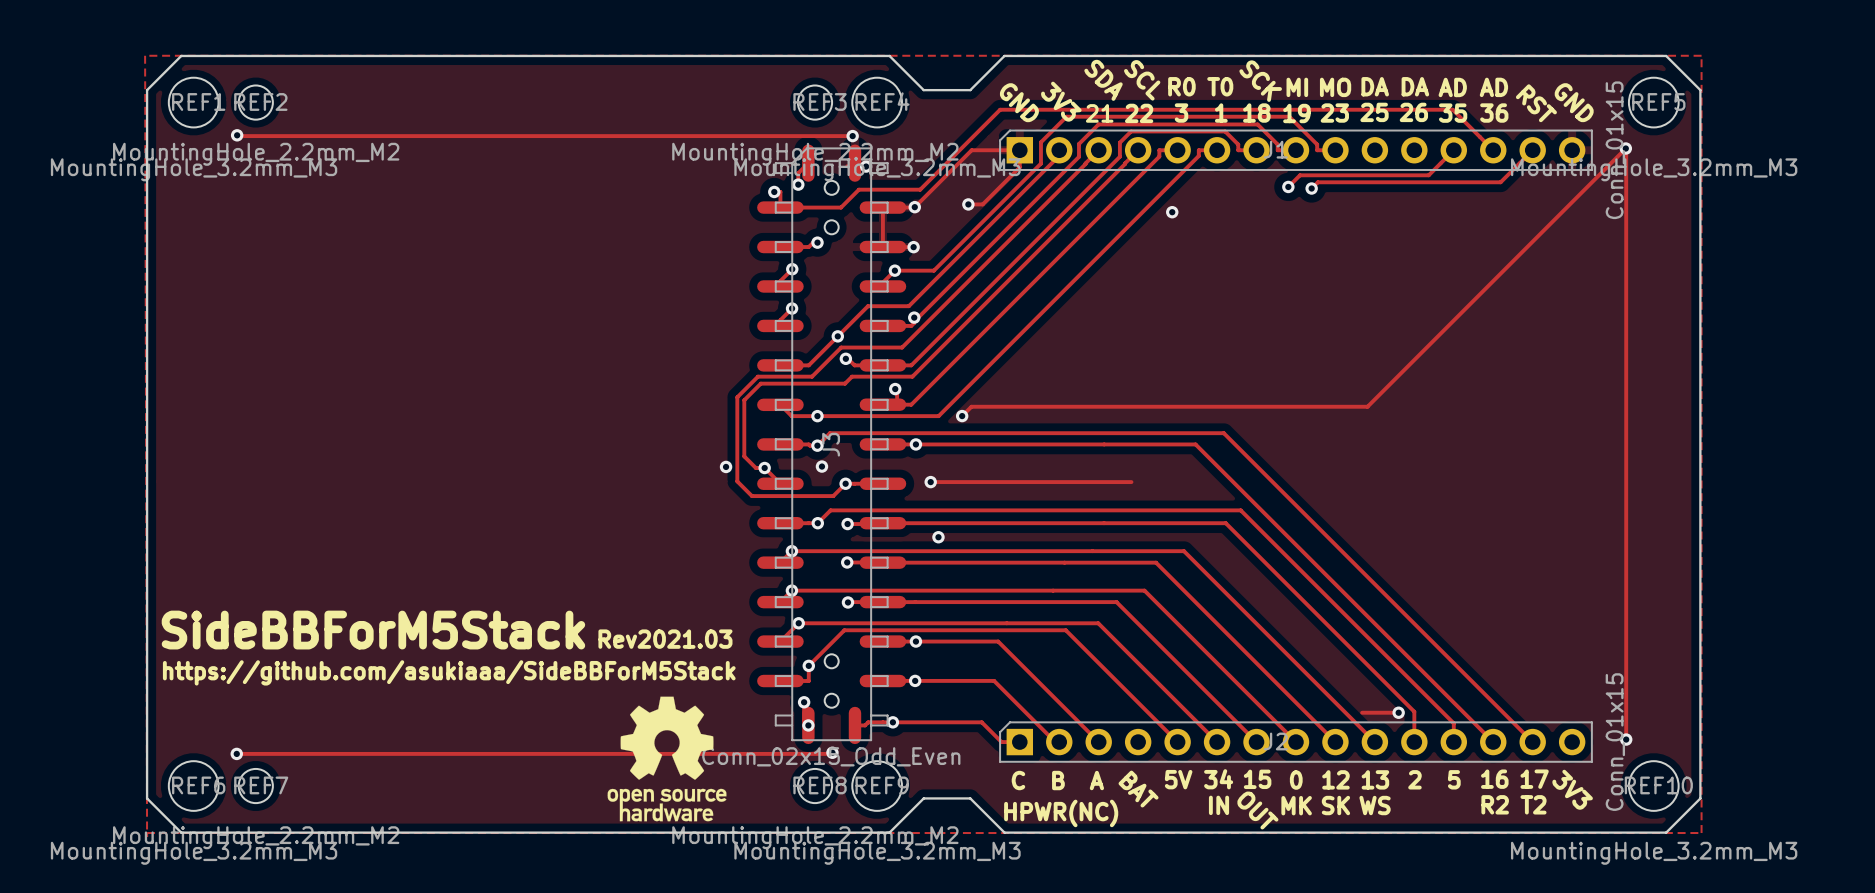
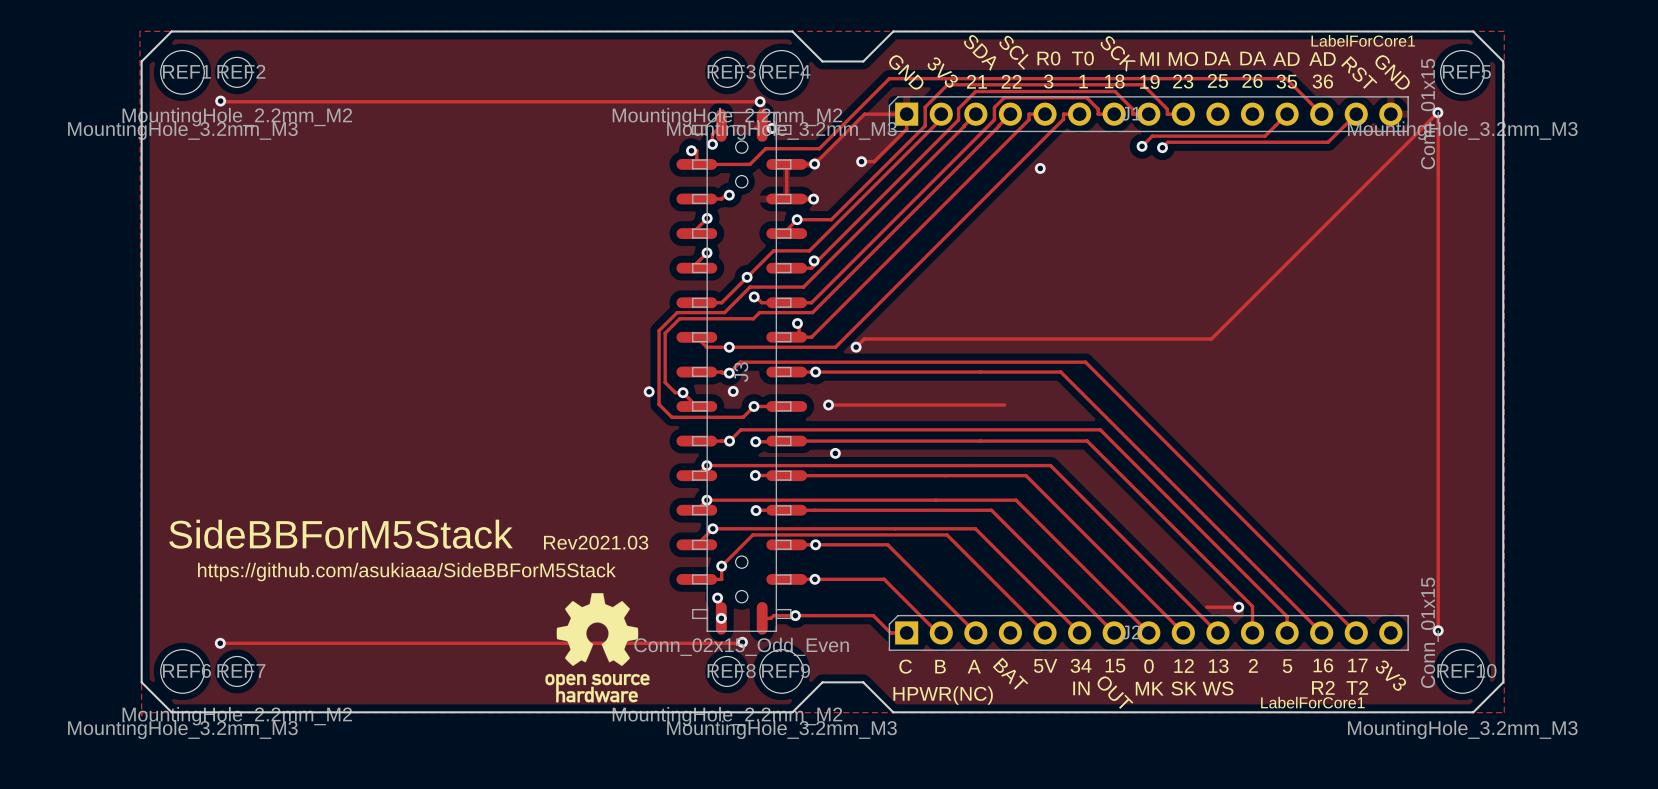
text: none -> LabelForCore1 (1363, 40)
text: none -> LabelForCore1 (1312, 702)

